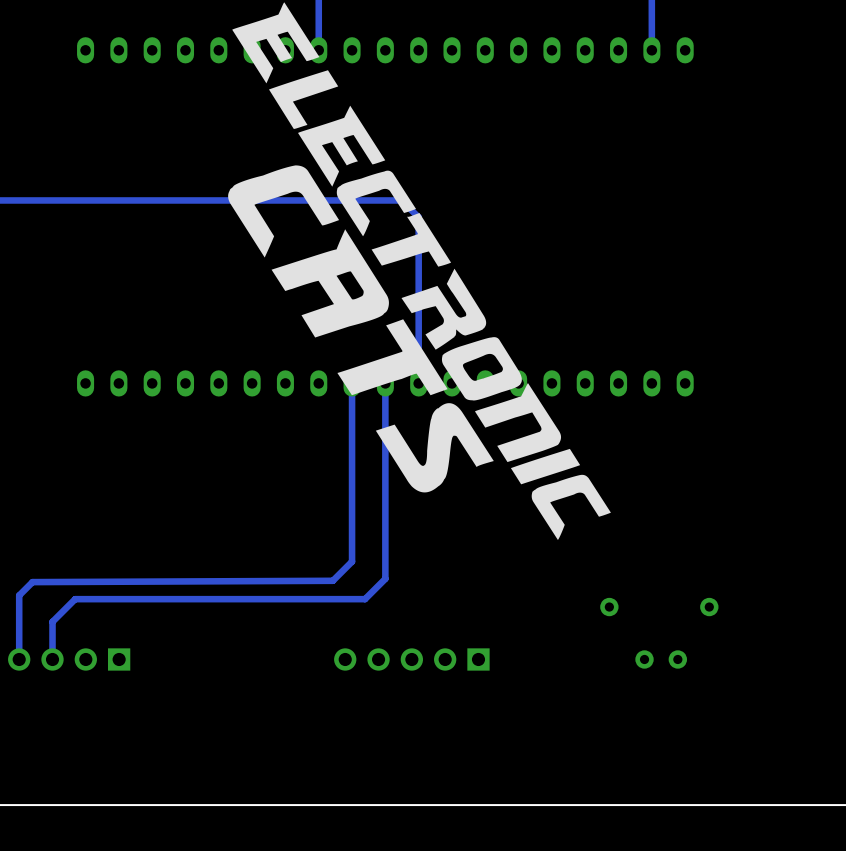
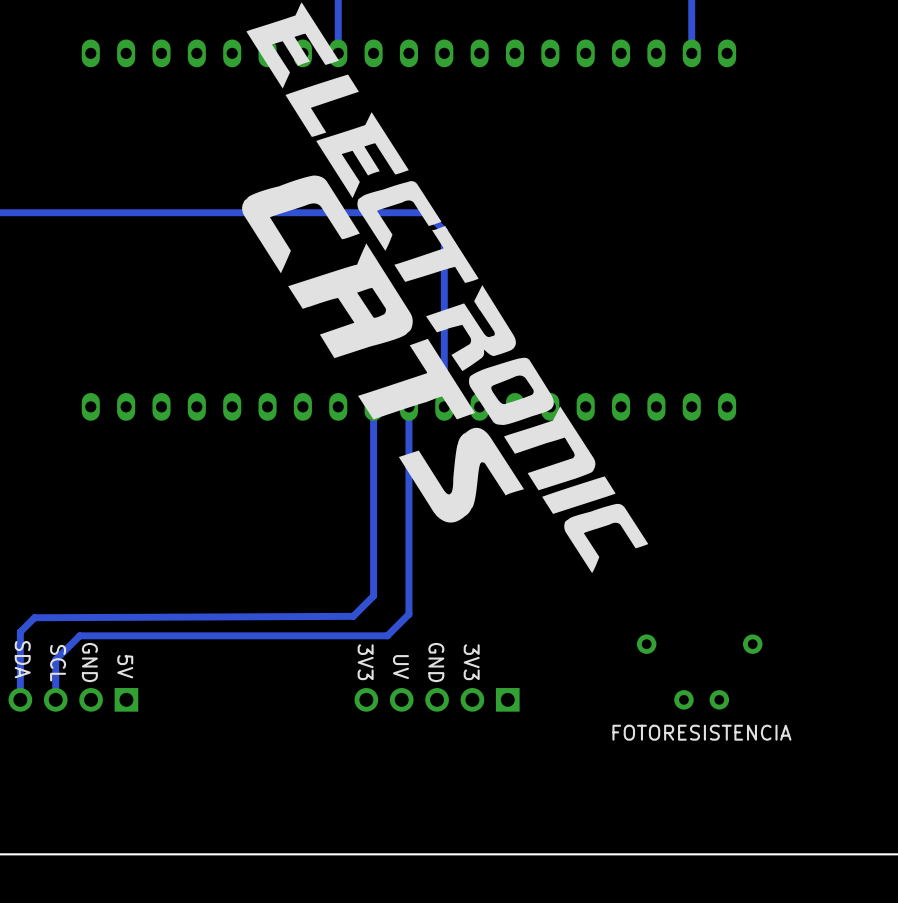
text: none -> SDA (22, 659)
text: none -> SCL (58, 663)
text: none -> GND (89, 662)
text: none -> 3V3 (365, 662)
text: none -> GND (436, 662)
text: none -> 3V3 (471, 662)
text: none -> 5V (125, 666)
text: none -> UV (400, 667)
text: none -> FOTORESISTENCIA (701, 732)

